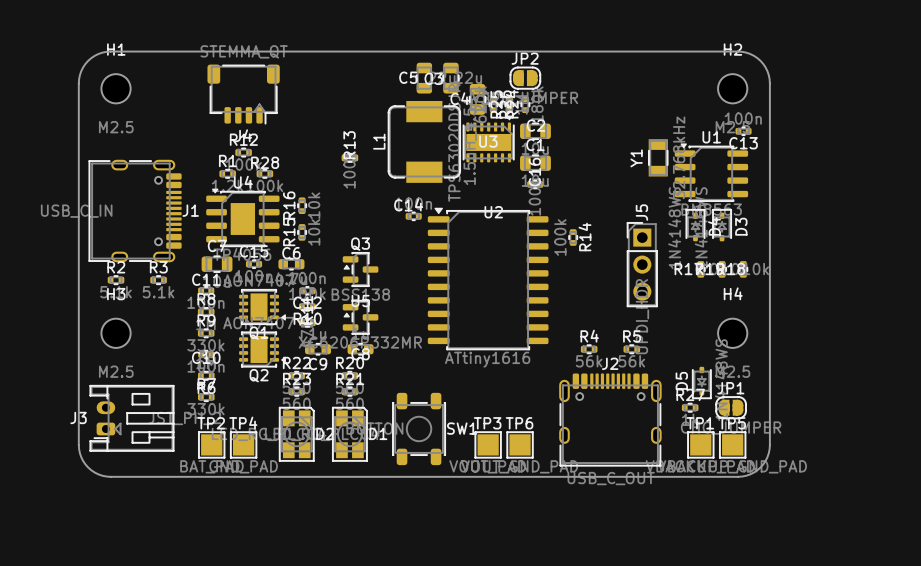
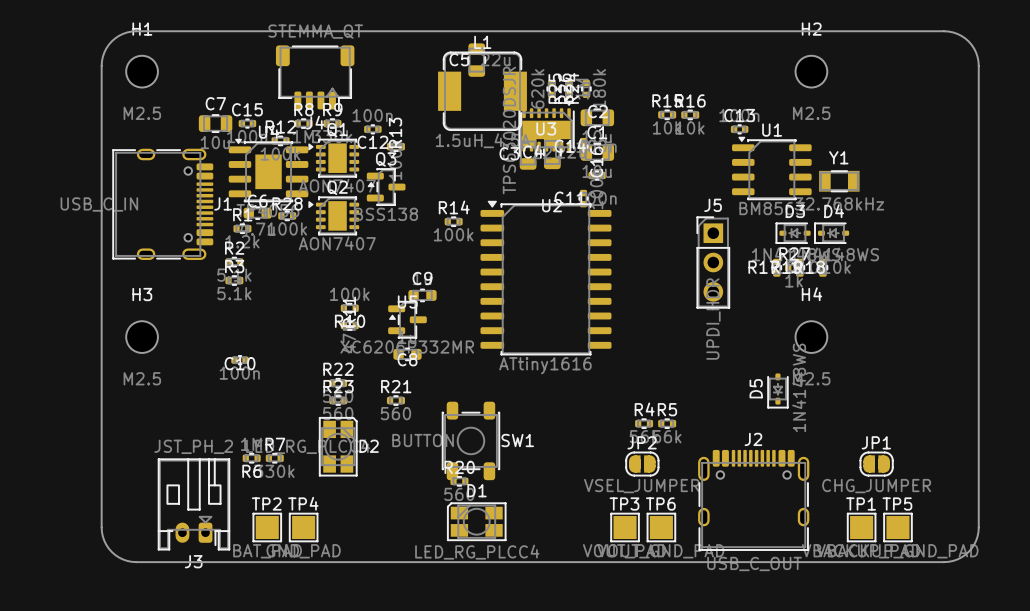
board edge: (738, 51) (750, 53) (760, 60) (767, 71) (769, 83) (769, 444) (765, 460) (753, 472) (738, 476) (110, 476) (98, 474) (88, 467) (81, 457) (78, 444) -> (817, 31) (948, 31) (961, 35) (968, 41) (977, 56) (978, 527) (974, 544) (961, 557) (944, 562) (131, 561) (115, 554) (106, 544) (102, 536) (101, 458)
C3 position: (450, 78) -> (528, 153)
JP2 position: (525, 78) -> (642, 464)
J4 position: (243, 94) -> (315, 77)
C4 position: (477, 99) -> (552, 152)
C13 position: (743, 131) -> (739, 129)
L1 rotation: 0° (424, 141) -> 90° clockwise (482, 91)
C13 name position: C13 (743, 143) -> C13 (739, 115)
Y1 rotation: 0° (658, 157) -> 90° clockwise (839, 181)
Y1 position: (658, 157) -> (839, 181)
U1 position: (711, 172) -> (771, 168)
R1 position: (227, 173) -> (242, 228)
R28 position: (264, 173) -> (287, 215)
R16 rotation: 0° (302, 205) -> 90° clockwise (690, 114)
R16 position: (302, 205) -> (690, 114)
J5 name rotation: 0° (641, 212) -> 90° clockwise (713, 205)
C14 rotation: 0° (413, 216) -> 90° clockwise (583, 146)
C14 position: (413, 216) -> (583, 146)
U4 position: (242, 217) -> (268, 170)
D4 rotation: 0° (695, 225) -> 90° counterclockwise (831, 233)
D4 position: (695, 225) -> (831, 233)
D3 rotation: 0° (722, 225) -> 90° counterclockwise (793, 233)
R15 rotation: 0° (302, 232) -> 90° clockwise (667, 114)
R15 position: (302, 232) -> (667, 114)
R14 rotation: 0° (573, 237) -> 90° clockwise (453, 221)
R14 position: (573, 237) -> (453, 221)
C7 position: (217, 264) -> (215, 123)
C15 position: (254, 264) -> (247, 123)
C6 position: (291, 264) -> (257, 213)
Q3 position: (360, 269) -> (386, 187)
R2 position: (116, 280) -> (234, 262)
R3 position: (158, 280) -> (234, 280)
C11 rotation: 0° (206, 290) -> 90° clockwise (583, 198)
C11 position: (206, 290) -> (583, 198)
C12 position: (307, 290) -> (372, 129)
Q1 rotation: 0° (262, 306) -> 180° (333, 158)
Q1 position: (262, 306) -> (333, 158)
R8 position: (206, 312) -> (303, 123)
R9 position: (206, 333) -> (332, 123)
Q2 rotation: 0° (262, 349) -> 180° (333, 215)
Q2 position: (262, 349) -> (333, 215)
C9 position: (318, 349) -> (422, 295)
R4 position: (589, 349) -> (644, 423)
R5 position: (631, 349) -> (667, 423)
C9 name position: C9 (318, 364) -> C9 (422, 278)
R6 position: (206, 375) -> (251, 458)
R20 position: (349, 375) -> (459, 481)
R7 position: (206, 397) -> (274, 458)
R27 position: (690, 407) -> (794, 267)
JP1 position: (731, 407) -> (876, 464)
J3 rotation: 0° (131, 418) -> 90° counterclockwise (193, 504)
J3 position: (131, 418) -> (193, 504)
J2 position: (610, 419) -> (753, 500)
D1 rotation: 0° (349, 434) -> 90° counterclockwise (476, 521)
D1 position: (349, 434) -> (476, 521)
TP2 position: (211, 444) -> (267, 527)
TP4 position: (243, 444) -> (303, 527)
TP3 position: (488, 444) -> (625, 527)
TP6 position: (520, 444) -> (661, 527)
TP1 position: (700, 444) -> (861, 527)
TP5 position: (732, 444) -> (897, 527)

